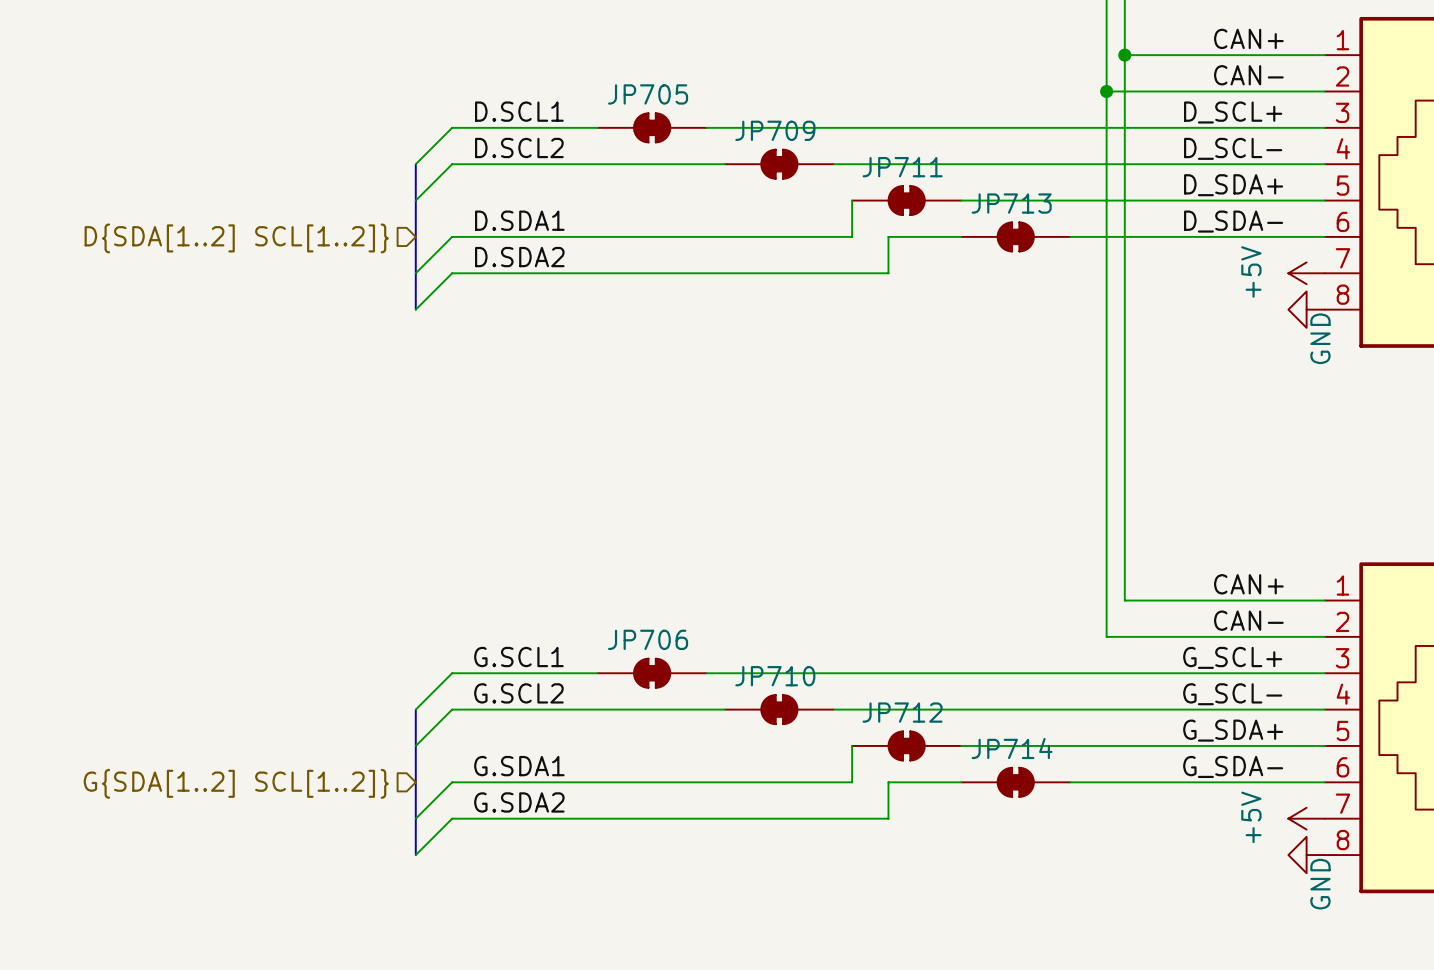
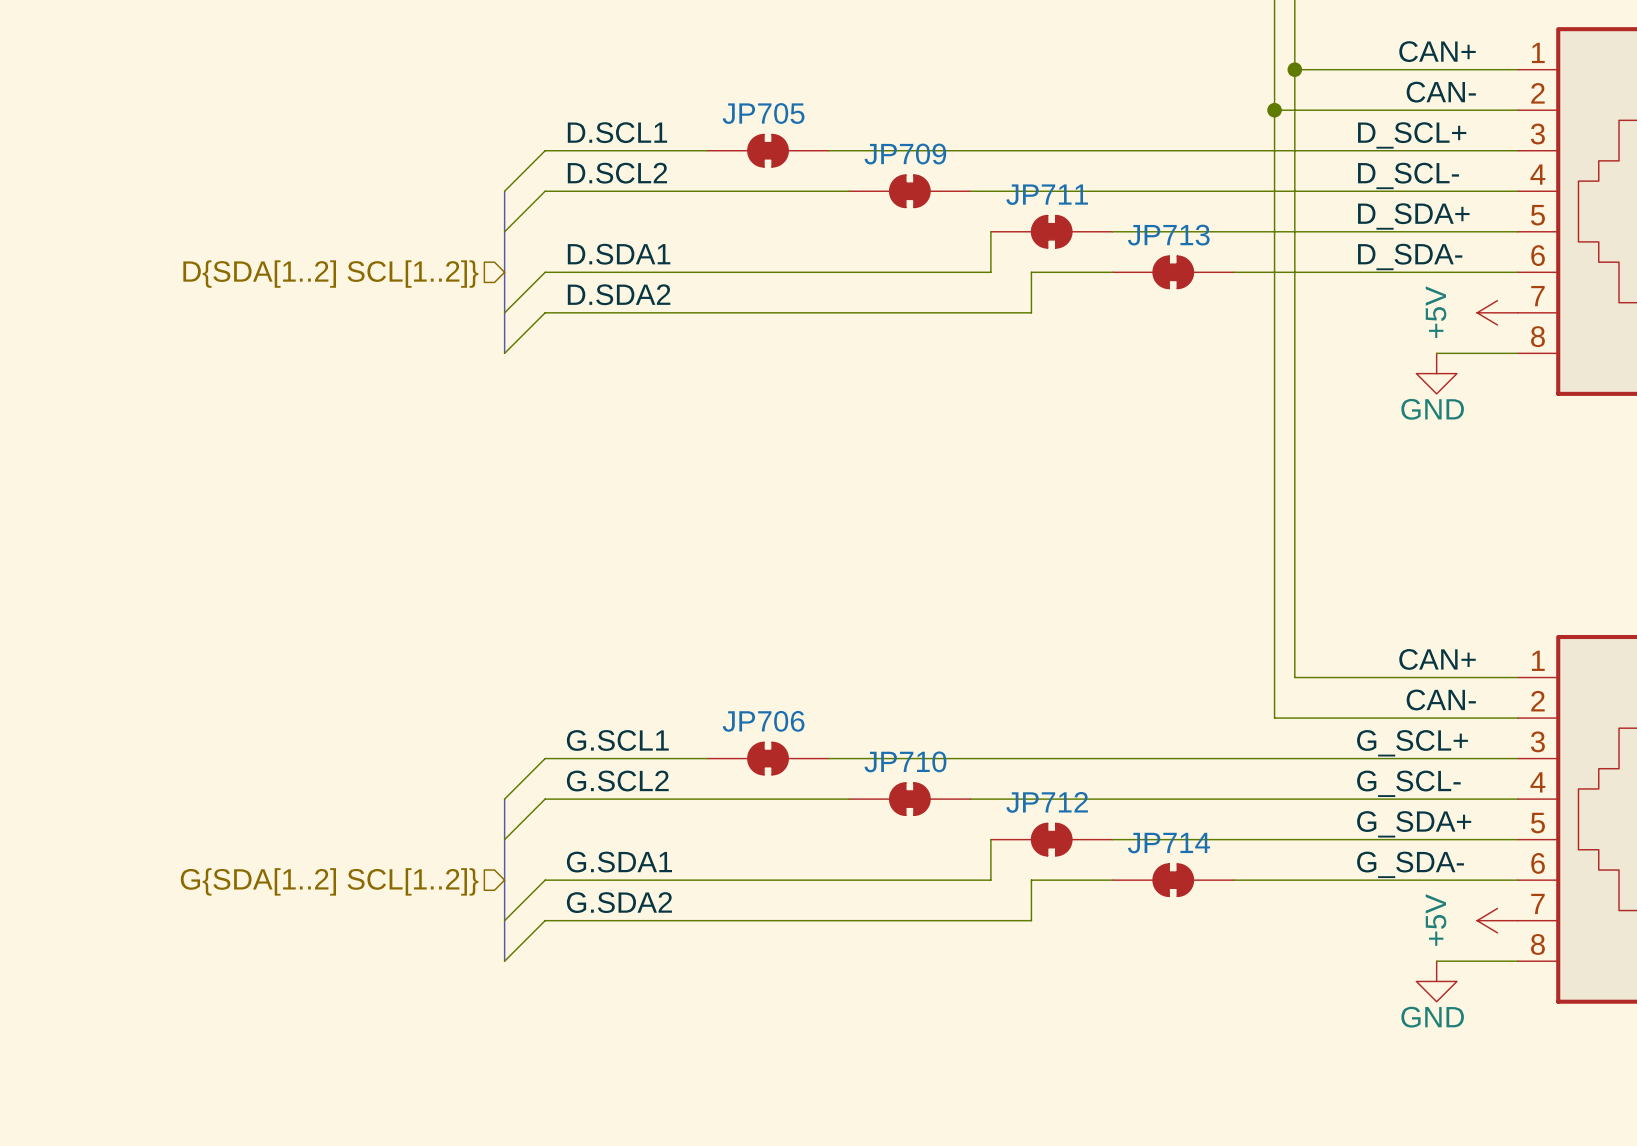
wire: none -> (1436, 353) (1517, 353)
power symbol rotation: 0° (1306, 309) -> 90° counterclockwise (1436, 373)
power symbol position: GND (1306, 309) -> GND (1436, 373)
wire: none -> (1436, 961) (1517, 961)
power symbol rotation: 0° (1306, 855) -> 90° counterclockwise (1436, 981)
power symbol position: GND (1306, 855) -> GND (1436, 981)

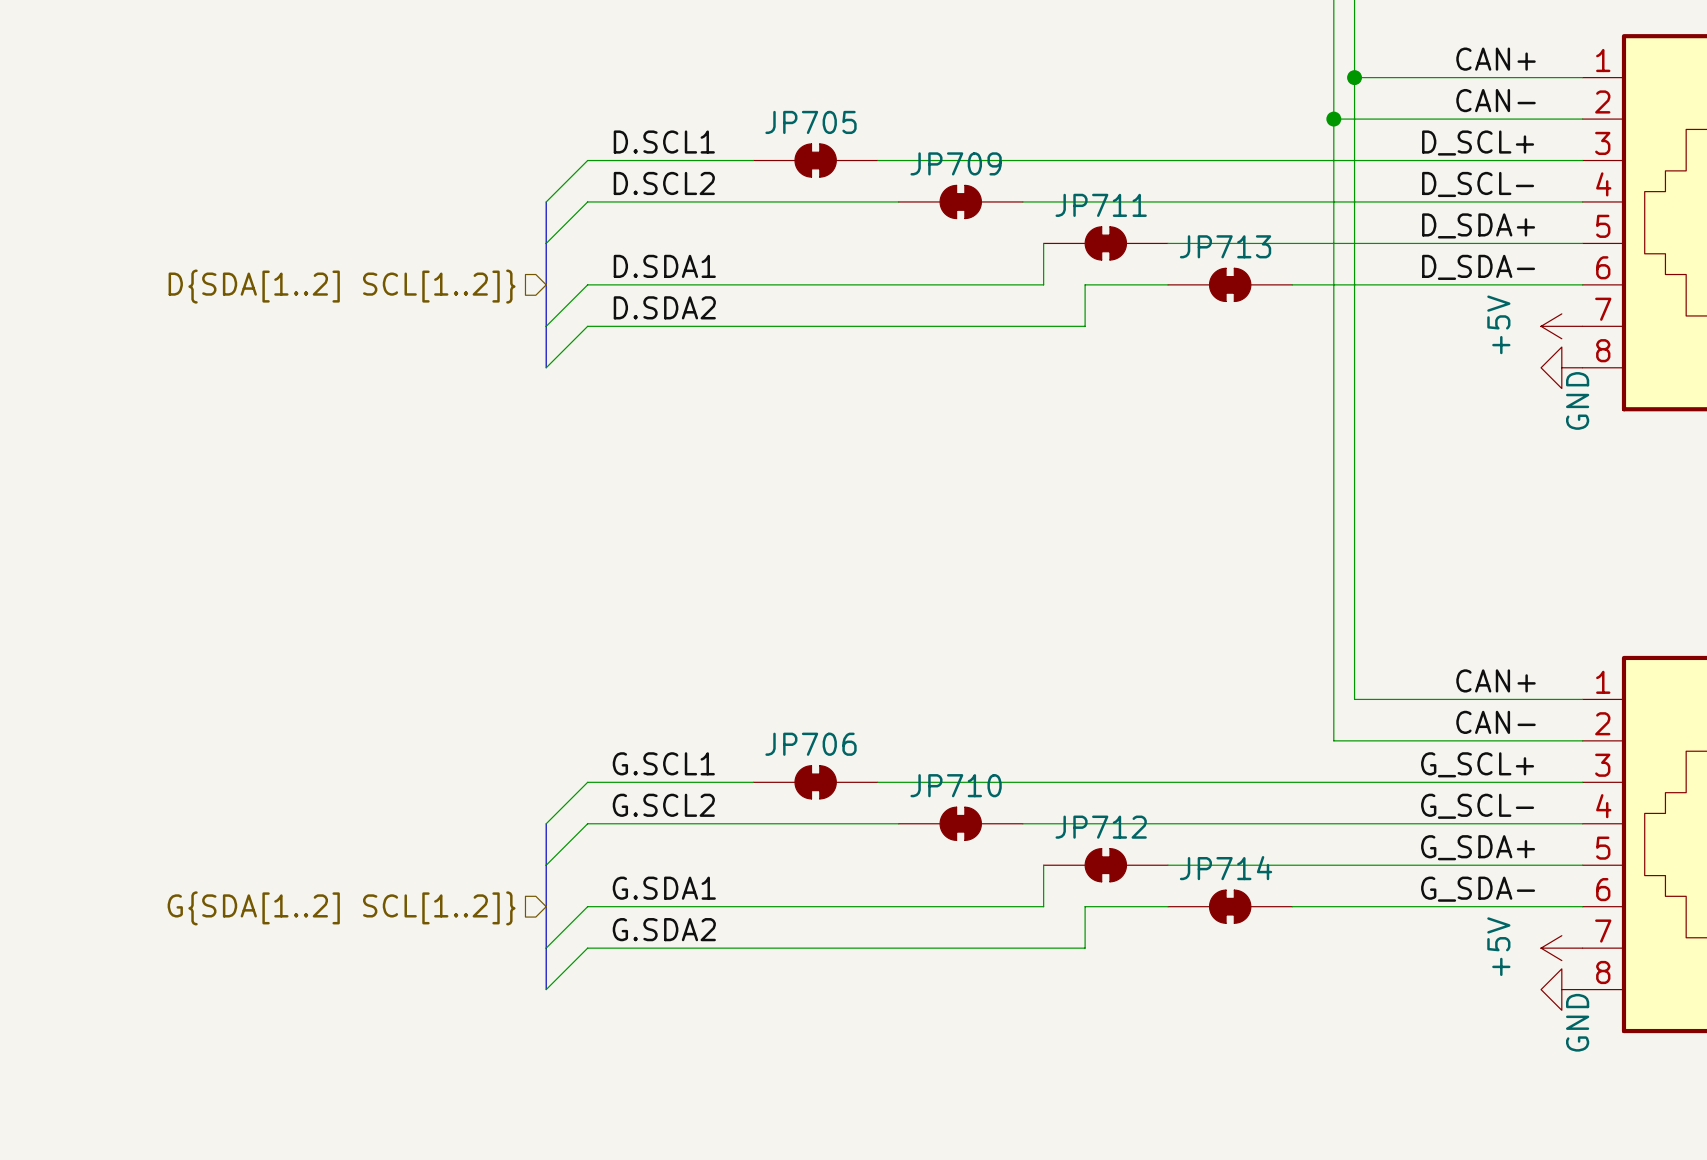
wire: (1436, 353) (1517, 353) -> none
power symbol rotation: 0° (1436, 373) -> 90° clockwise (1561, 367)
power symbol position: GND (1436, 373) -> GND (1561, 367)
wire: (1436, 961) (1517, 961) -> none
power symbol rotation: 0° (1436, 981) -> 90° clockwise (1561, 989)
power symbol position: GND (1436, 981) -> GND (1561, 989)

